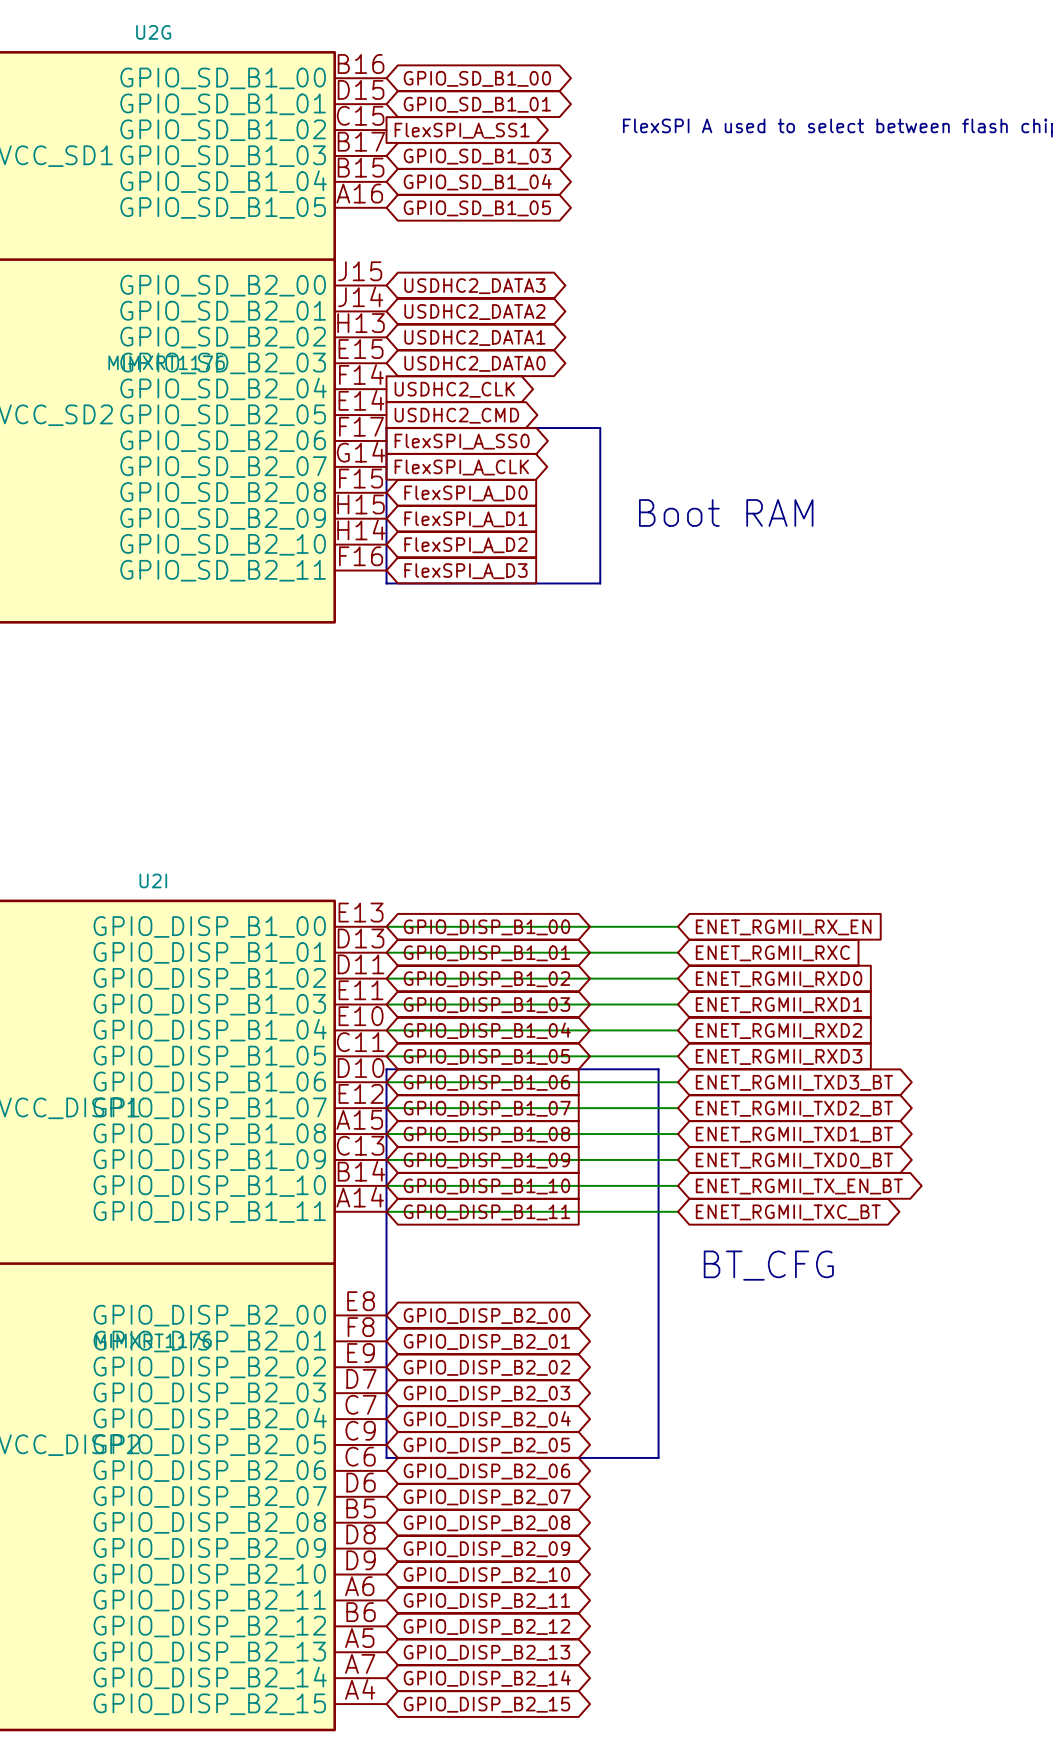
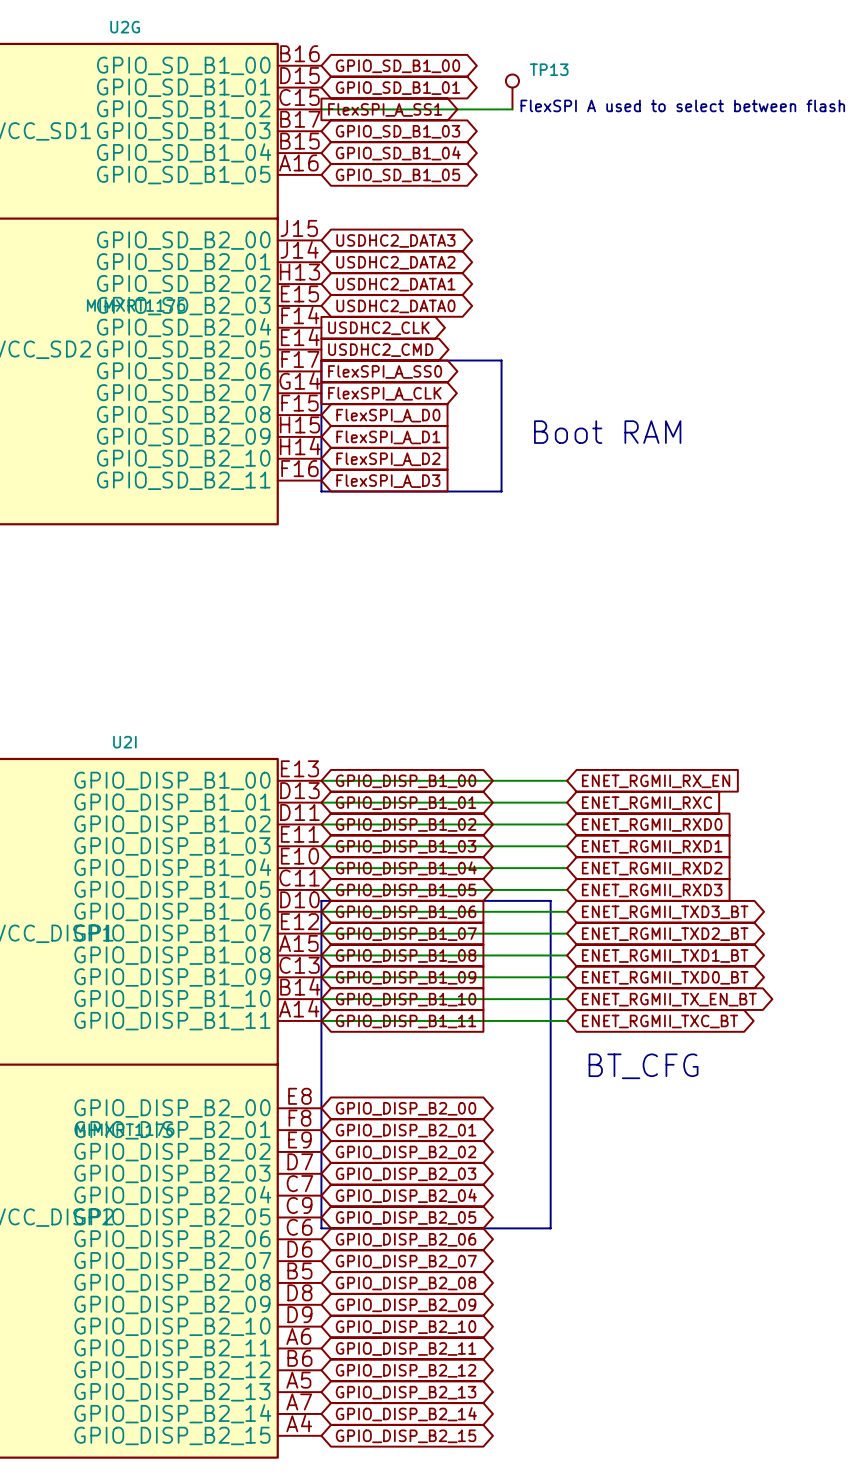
TP13: none -> (512, 91)
wire: none -> (321, 109) (512, 109)

